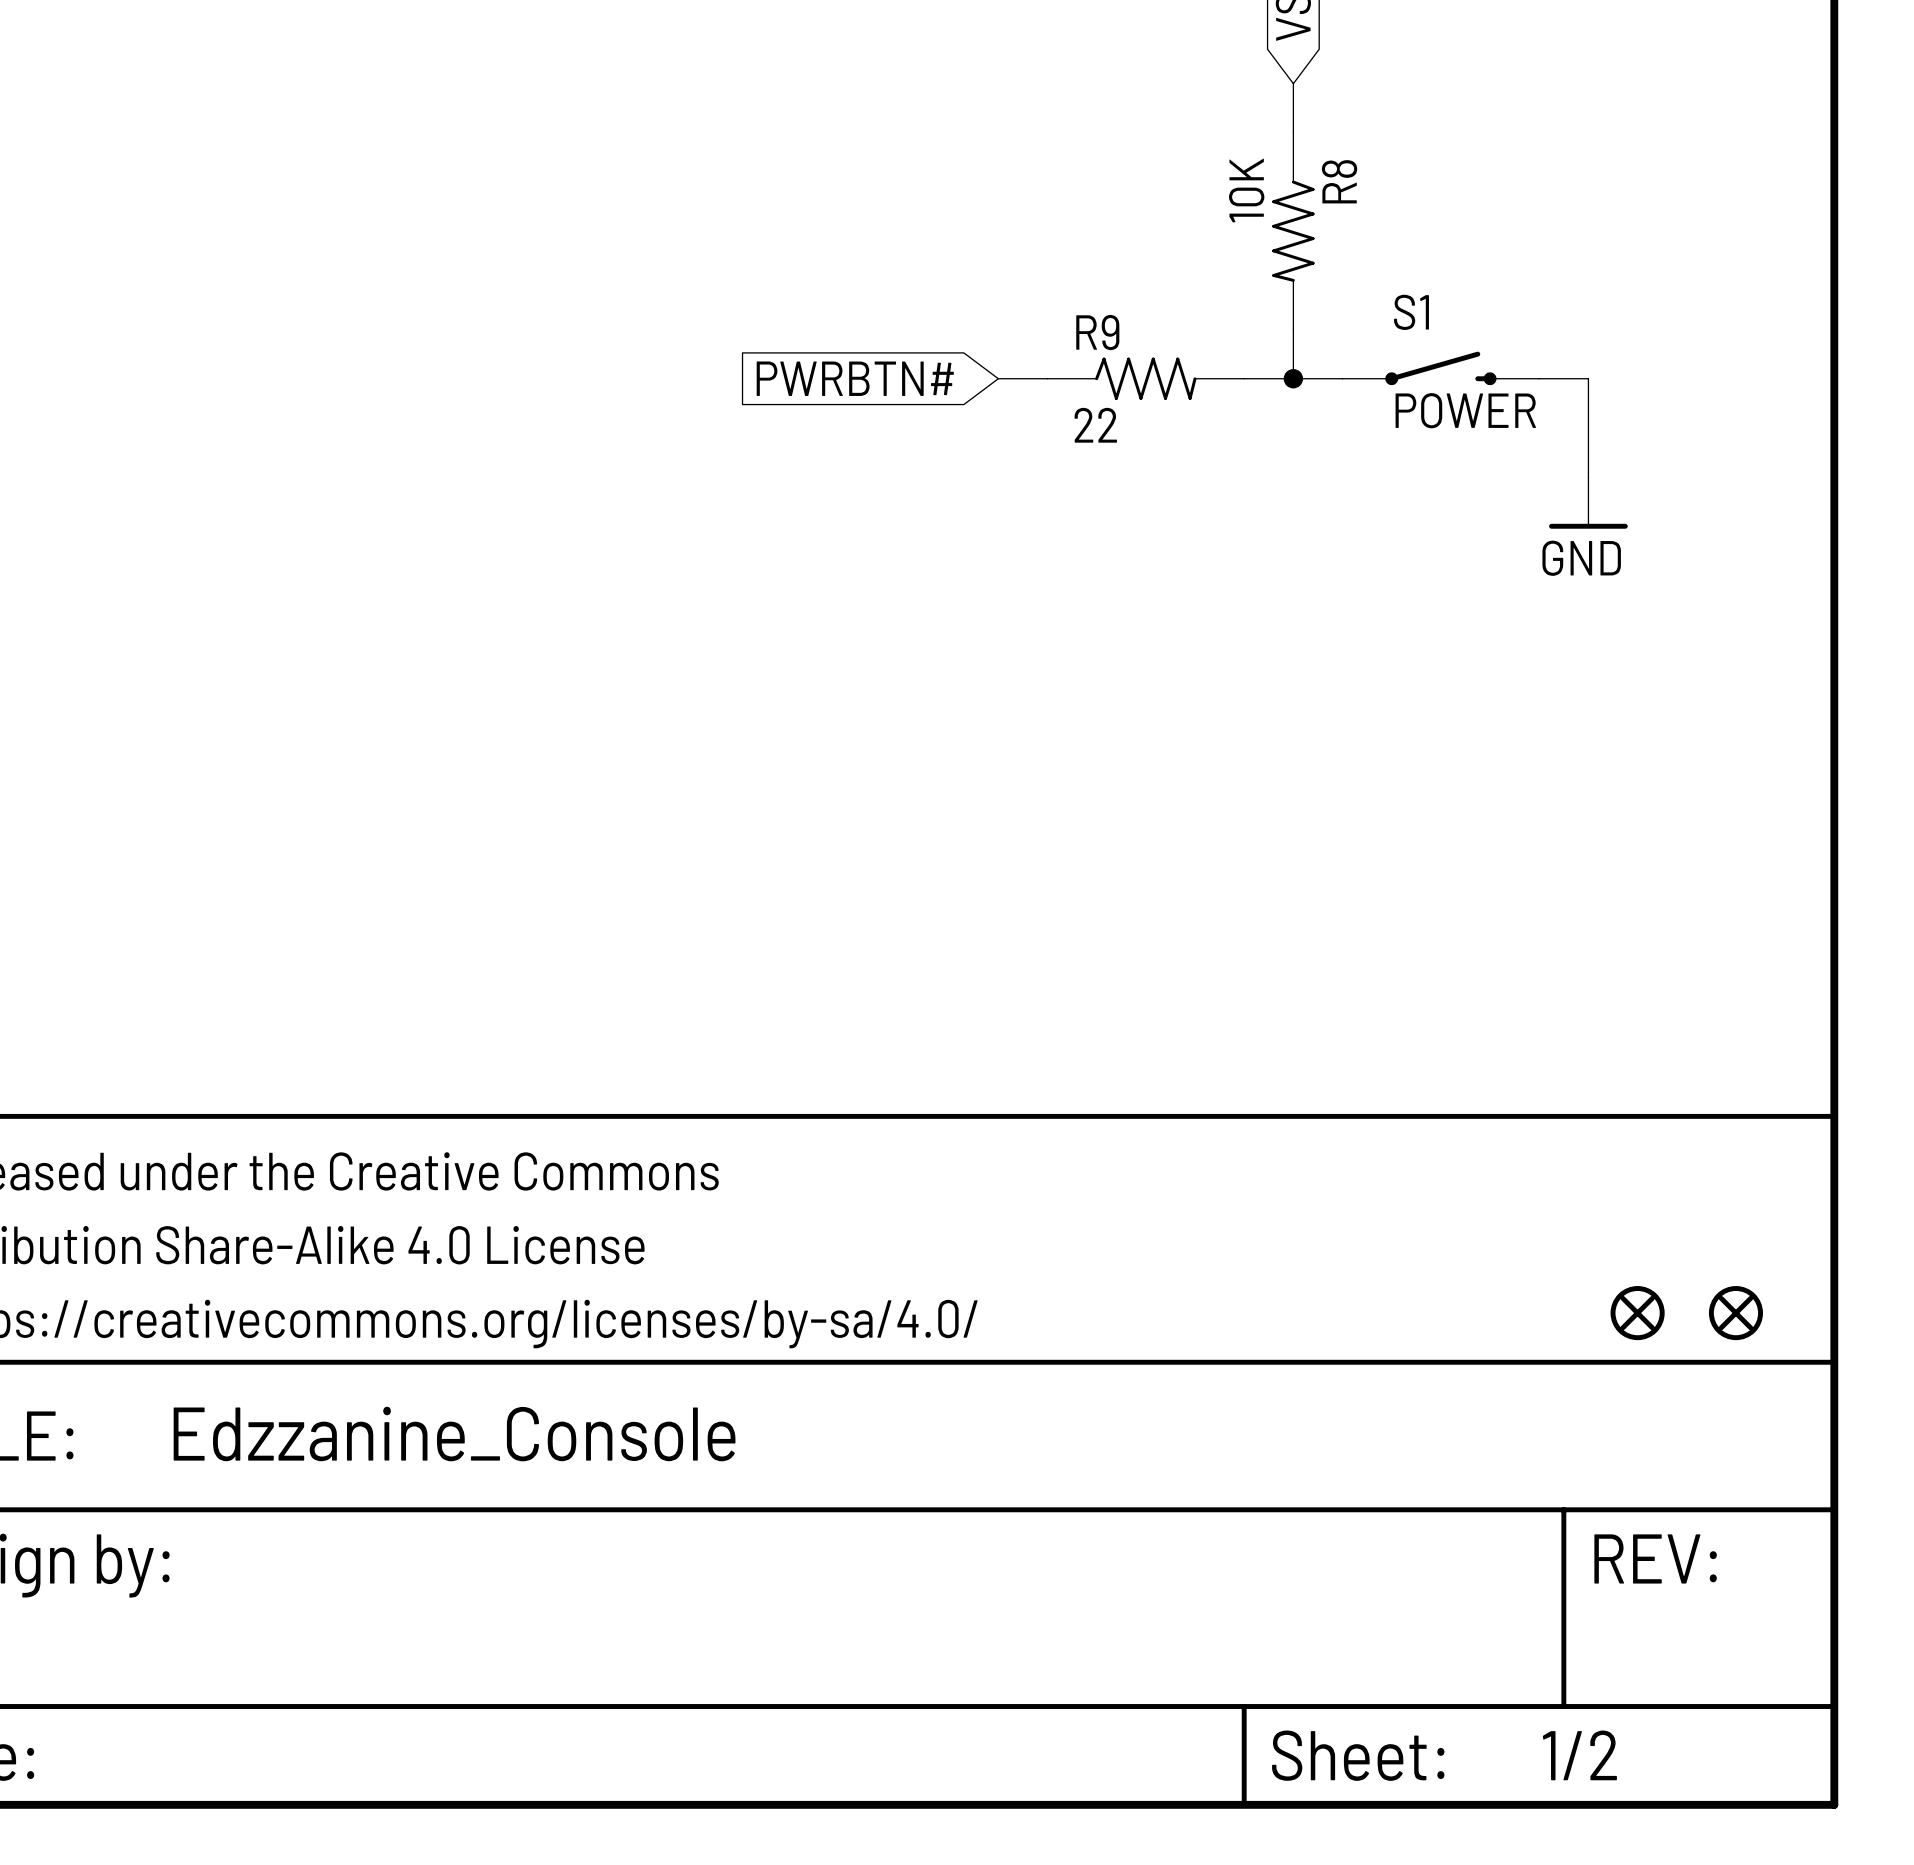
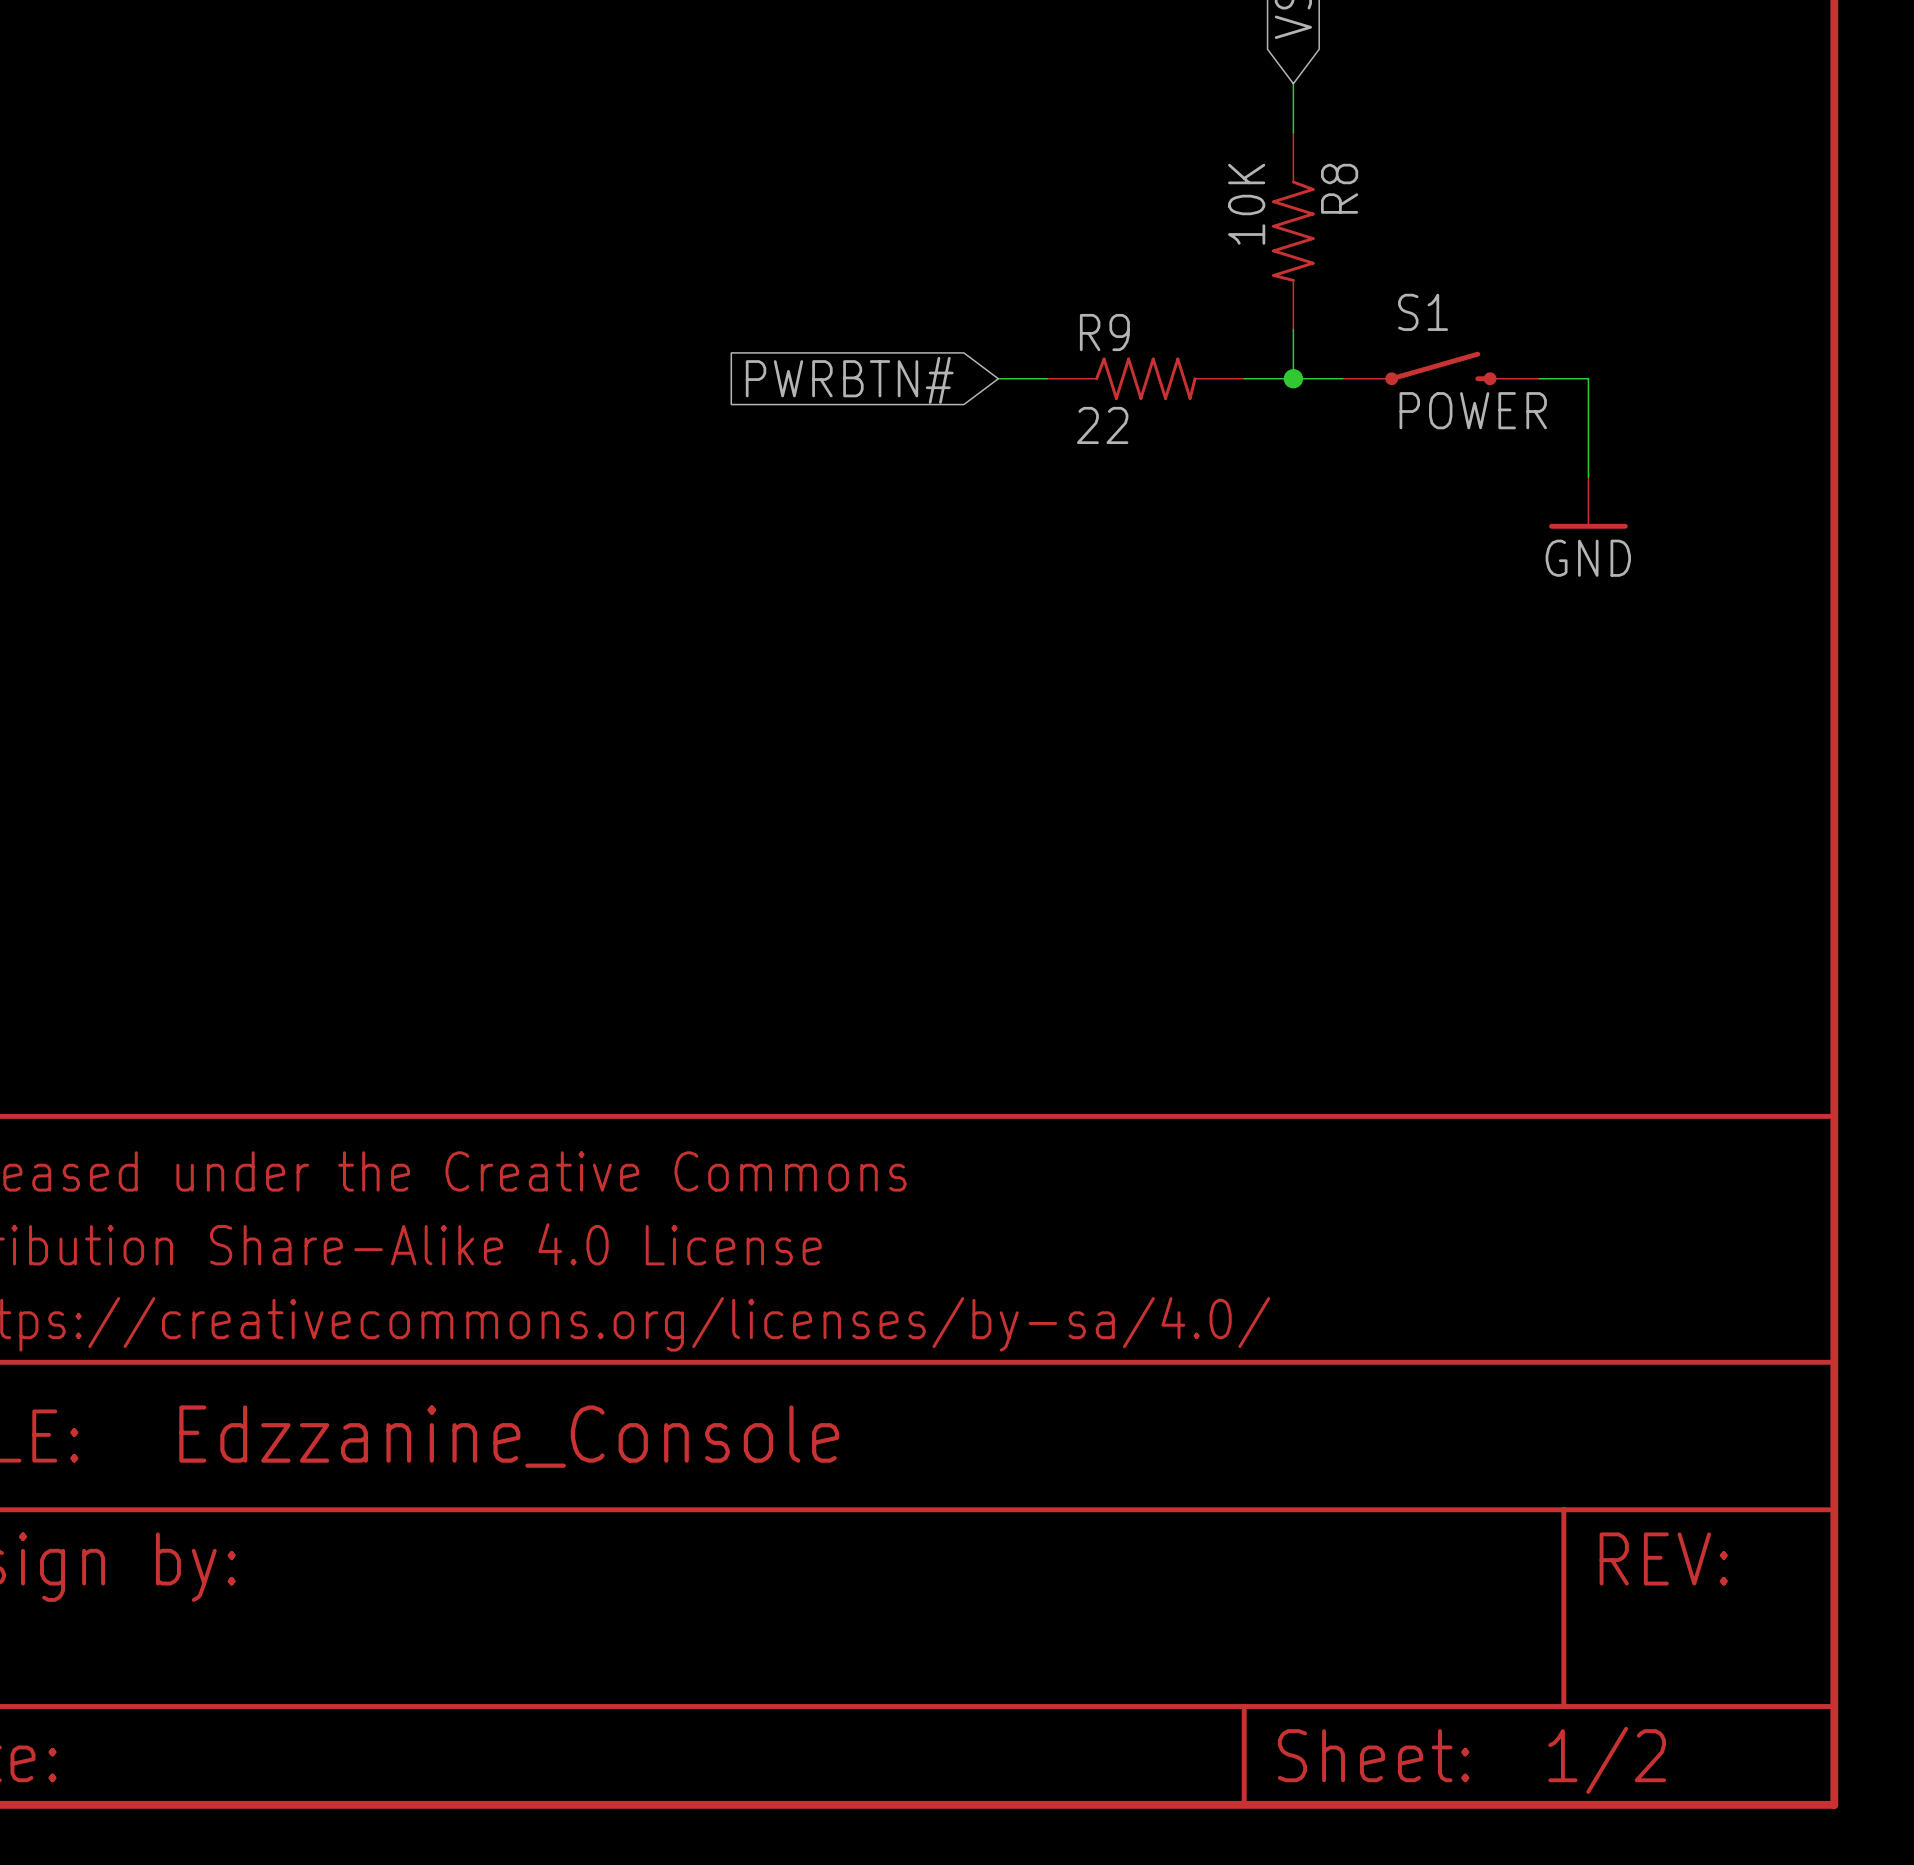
part: (1637, 1313) -> none
part: (1735, 1313) -> none

